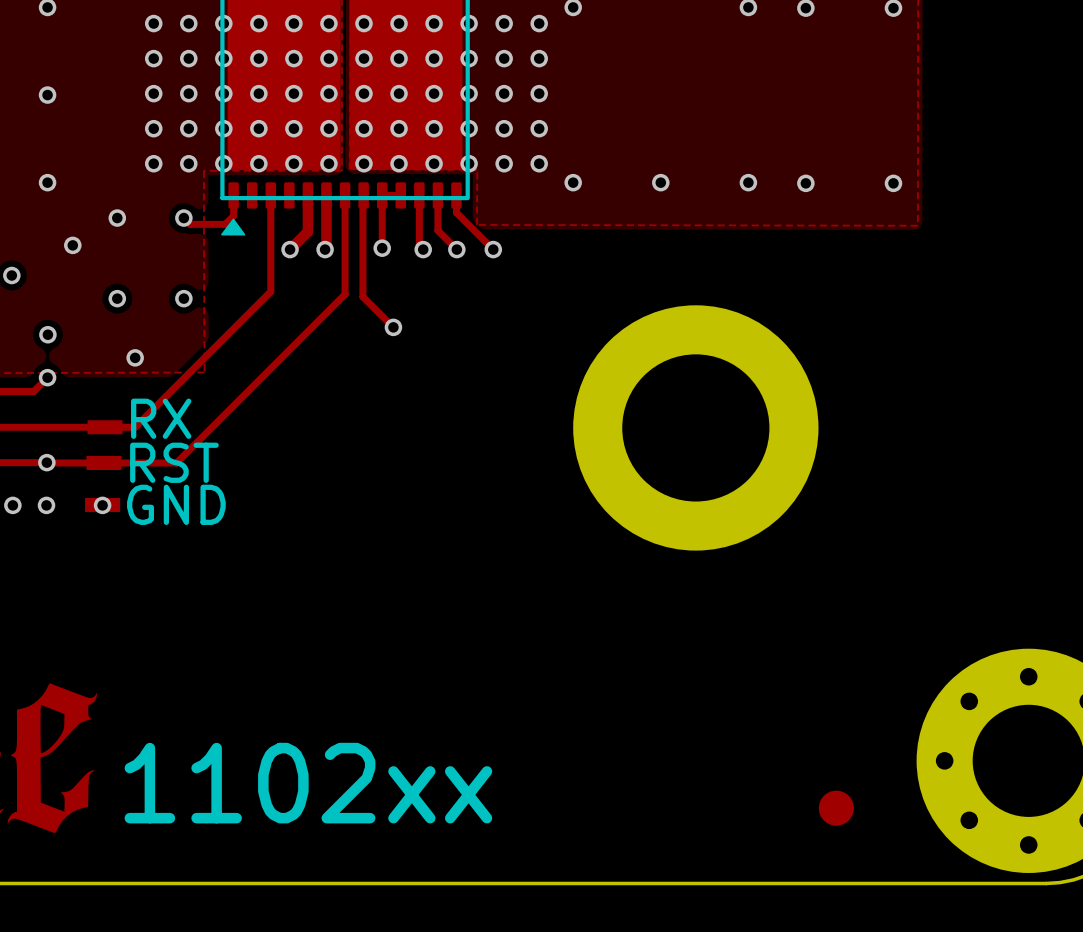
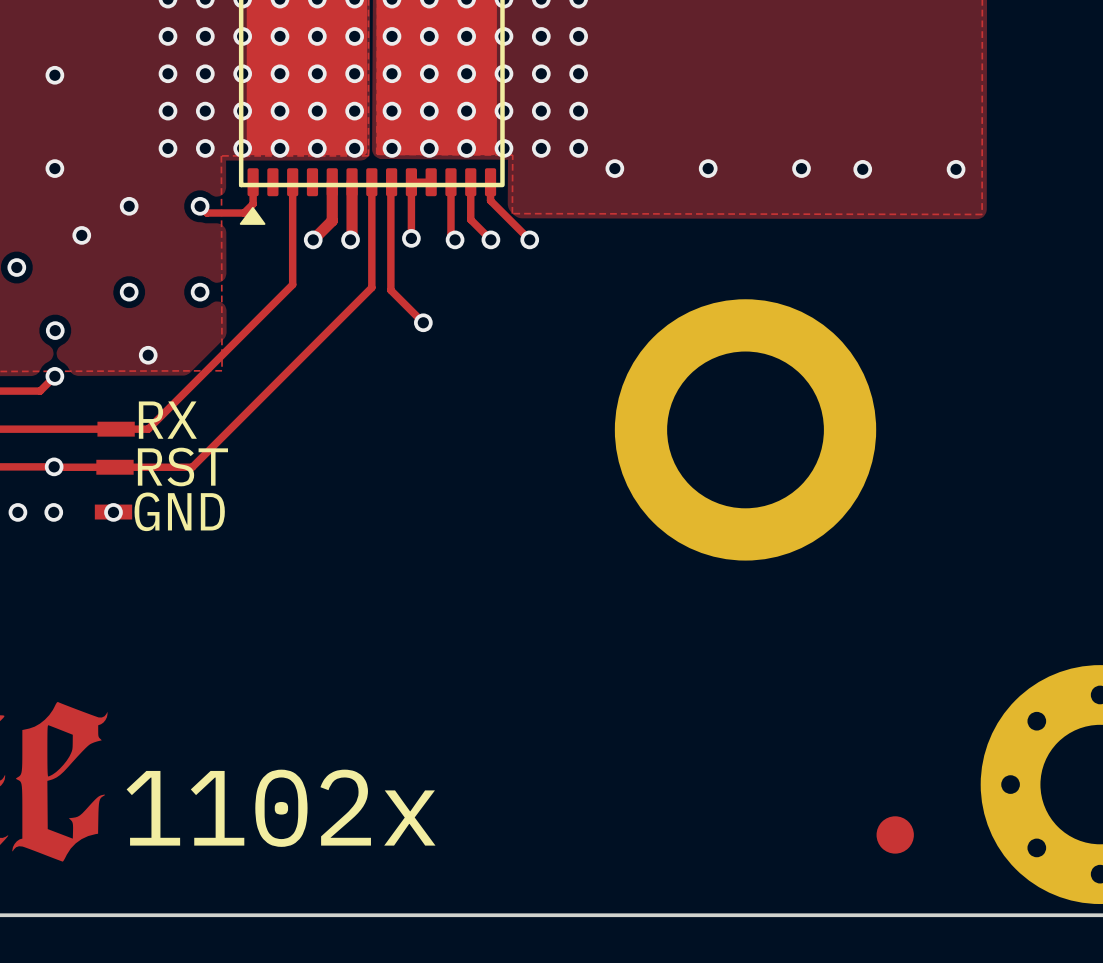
text: 1102xx (308, 783) -> 1102x (281, 808)

